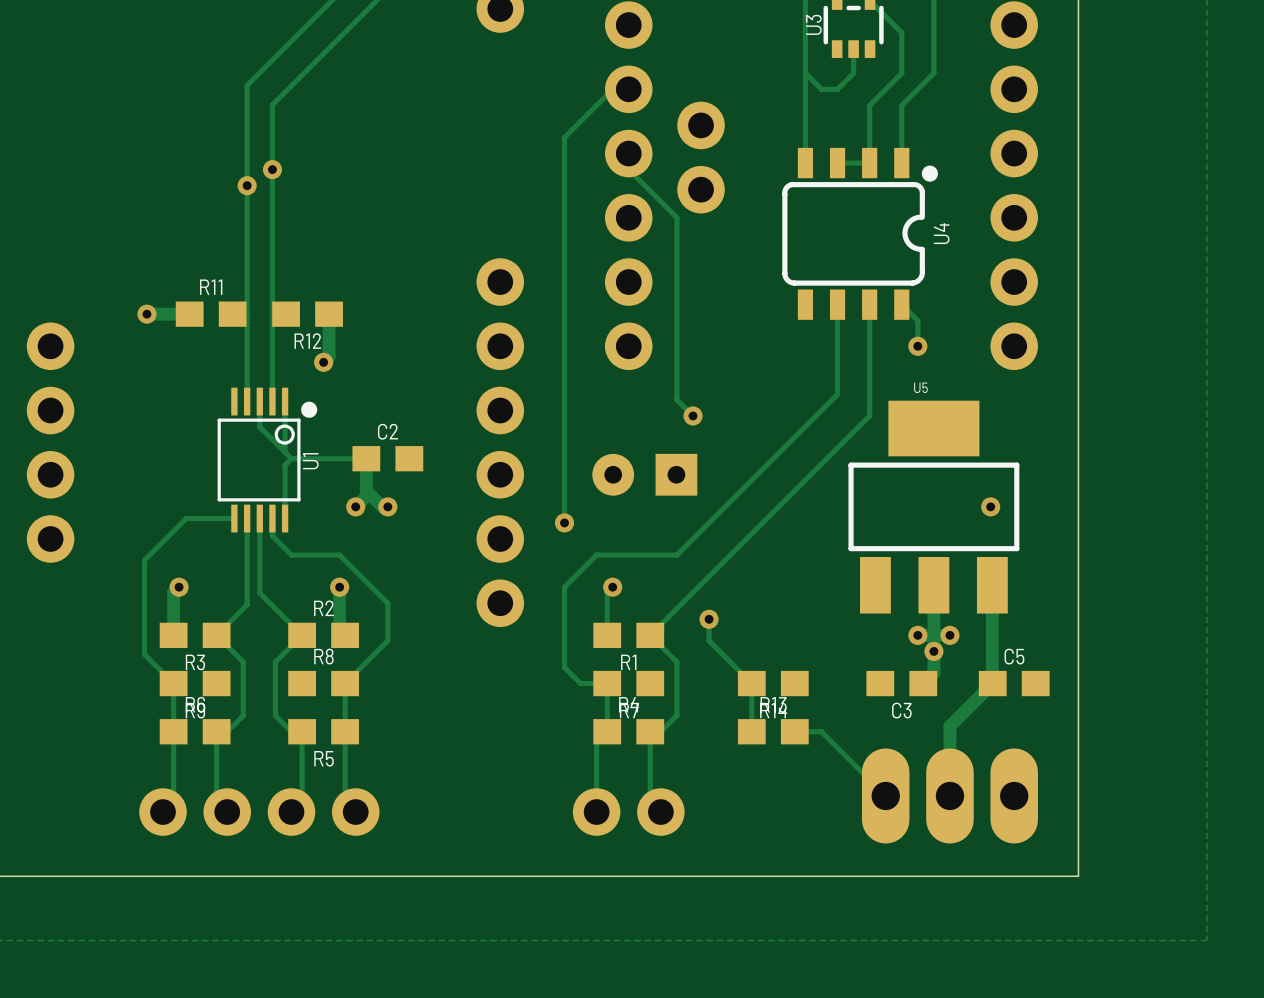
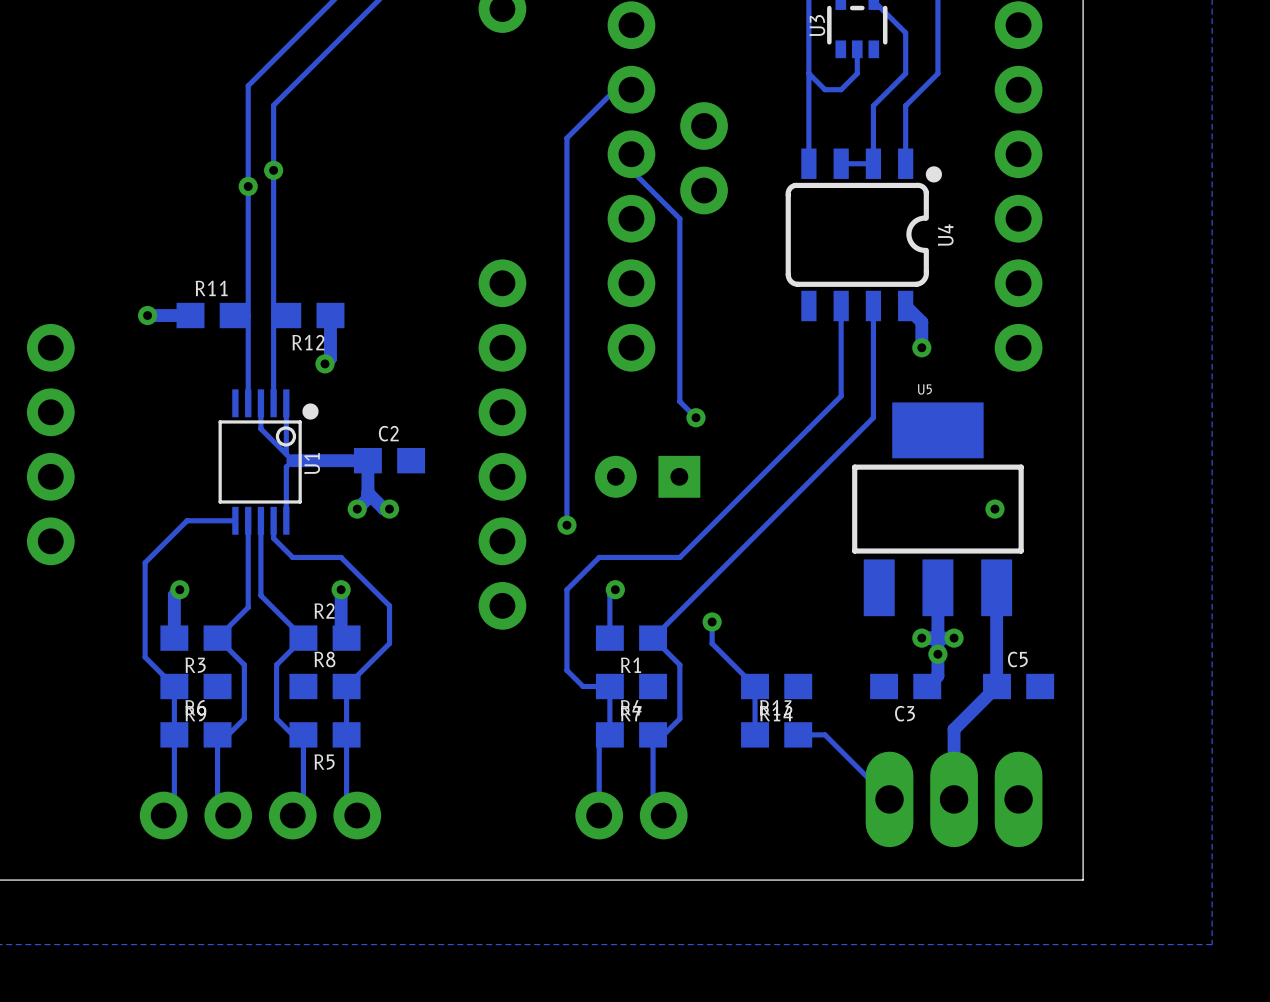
track width: thin (901, 304) (917, 320) (917, 346) -> thick (905, 305) (921, 322) (921, 347)
track width: thin (366, 458) (291, 458) -> thick (367, 460) (292, 460)

